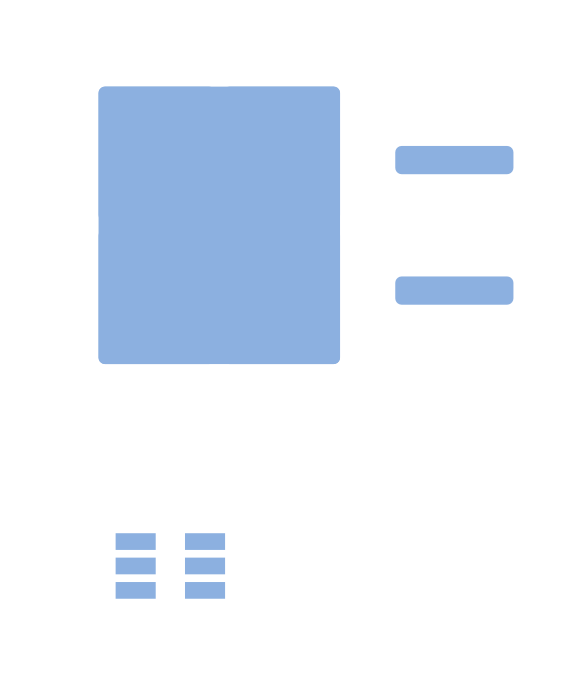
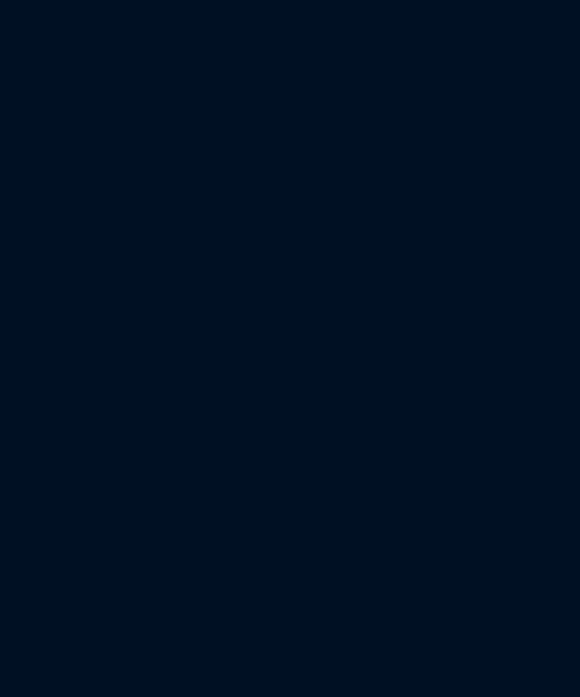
part: (305, 225) -> none
part: (170, 565) -> none

